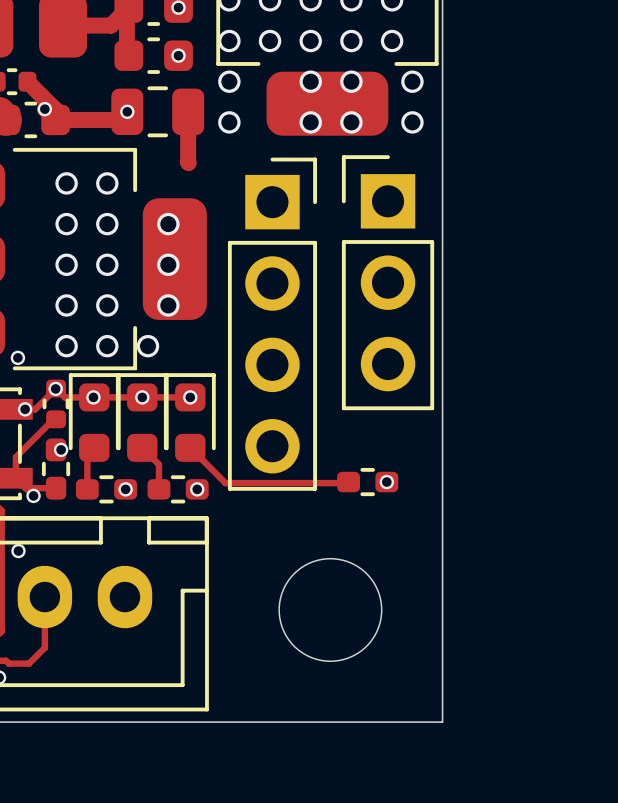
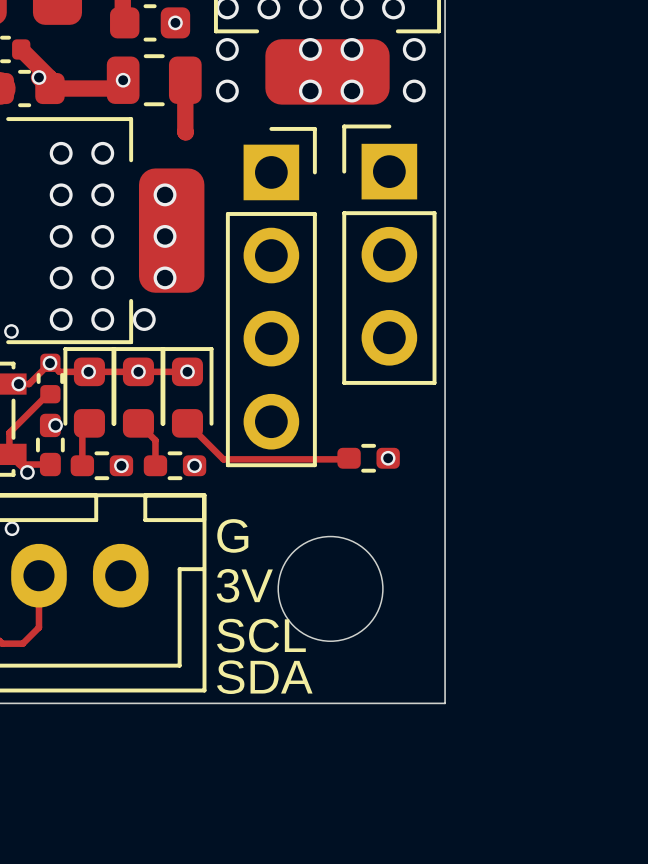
text: none -> G (232, 535)
text: none -> 3V (244, 585)
text: none -> SCL (261, 635)
text: none -> SDA (264, 677)

